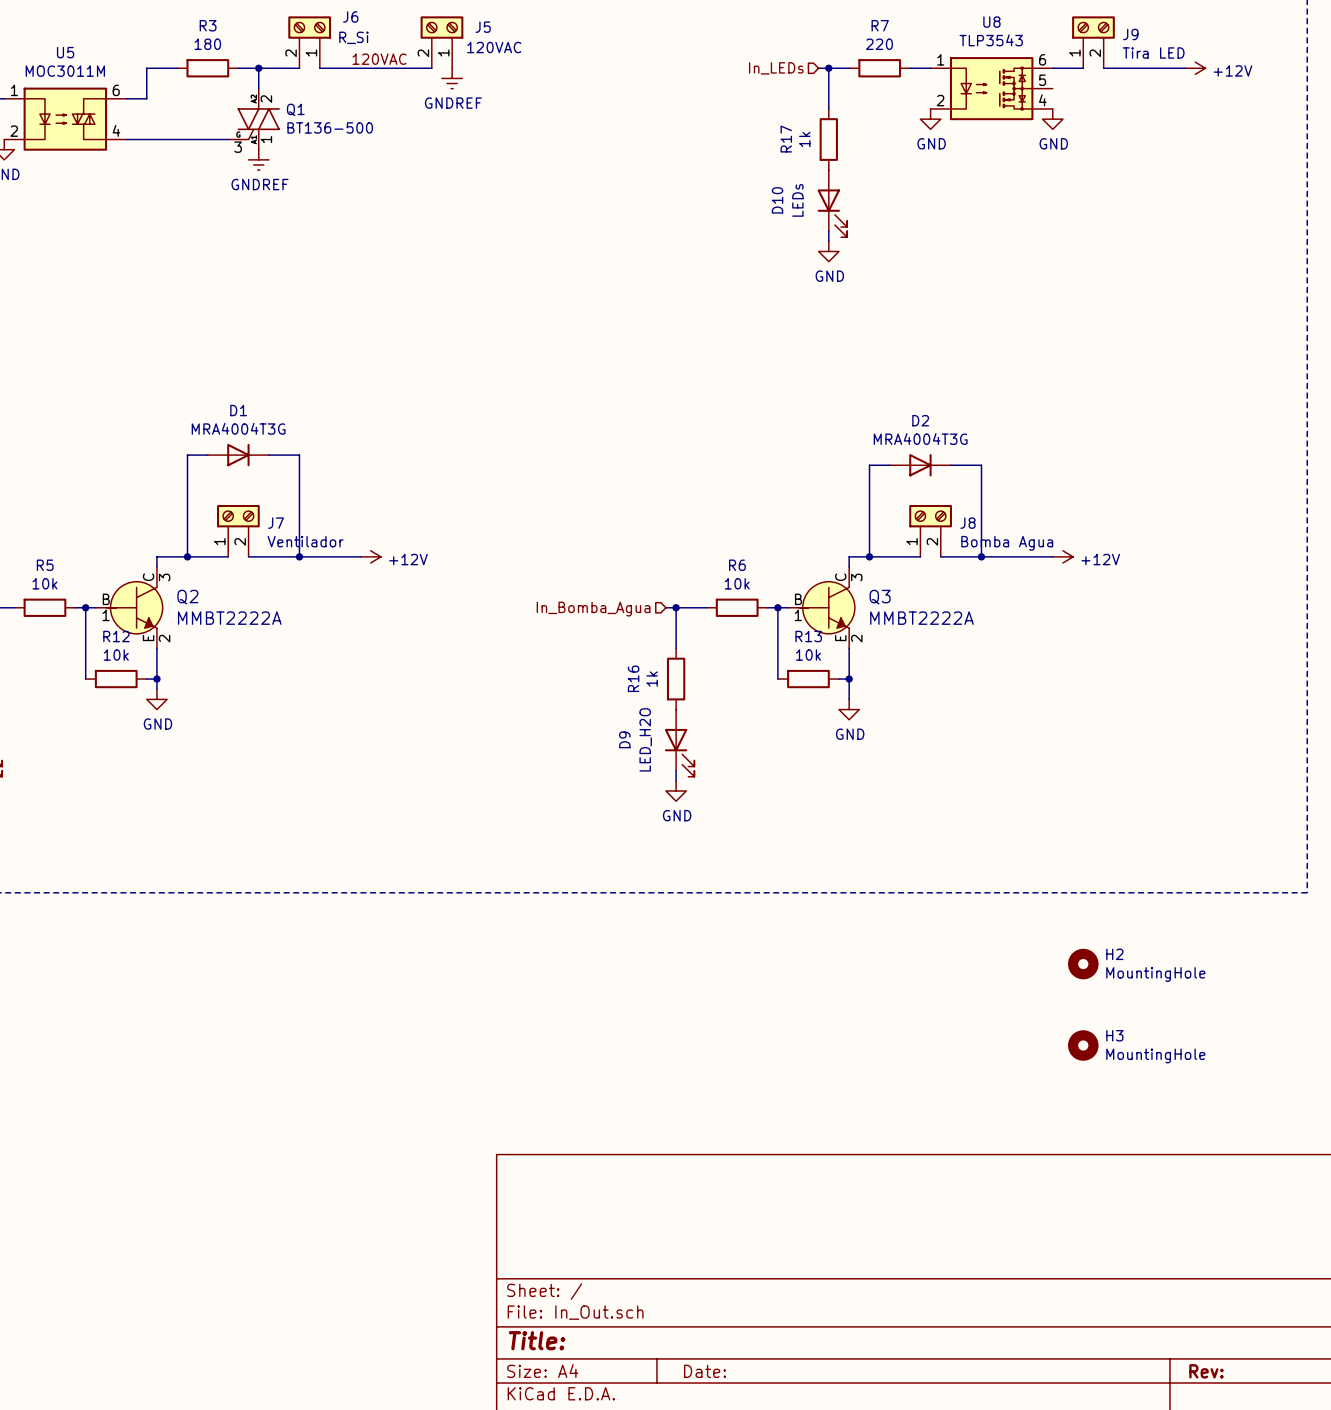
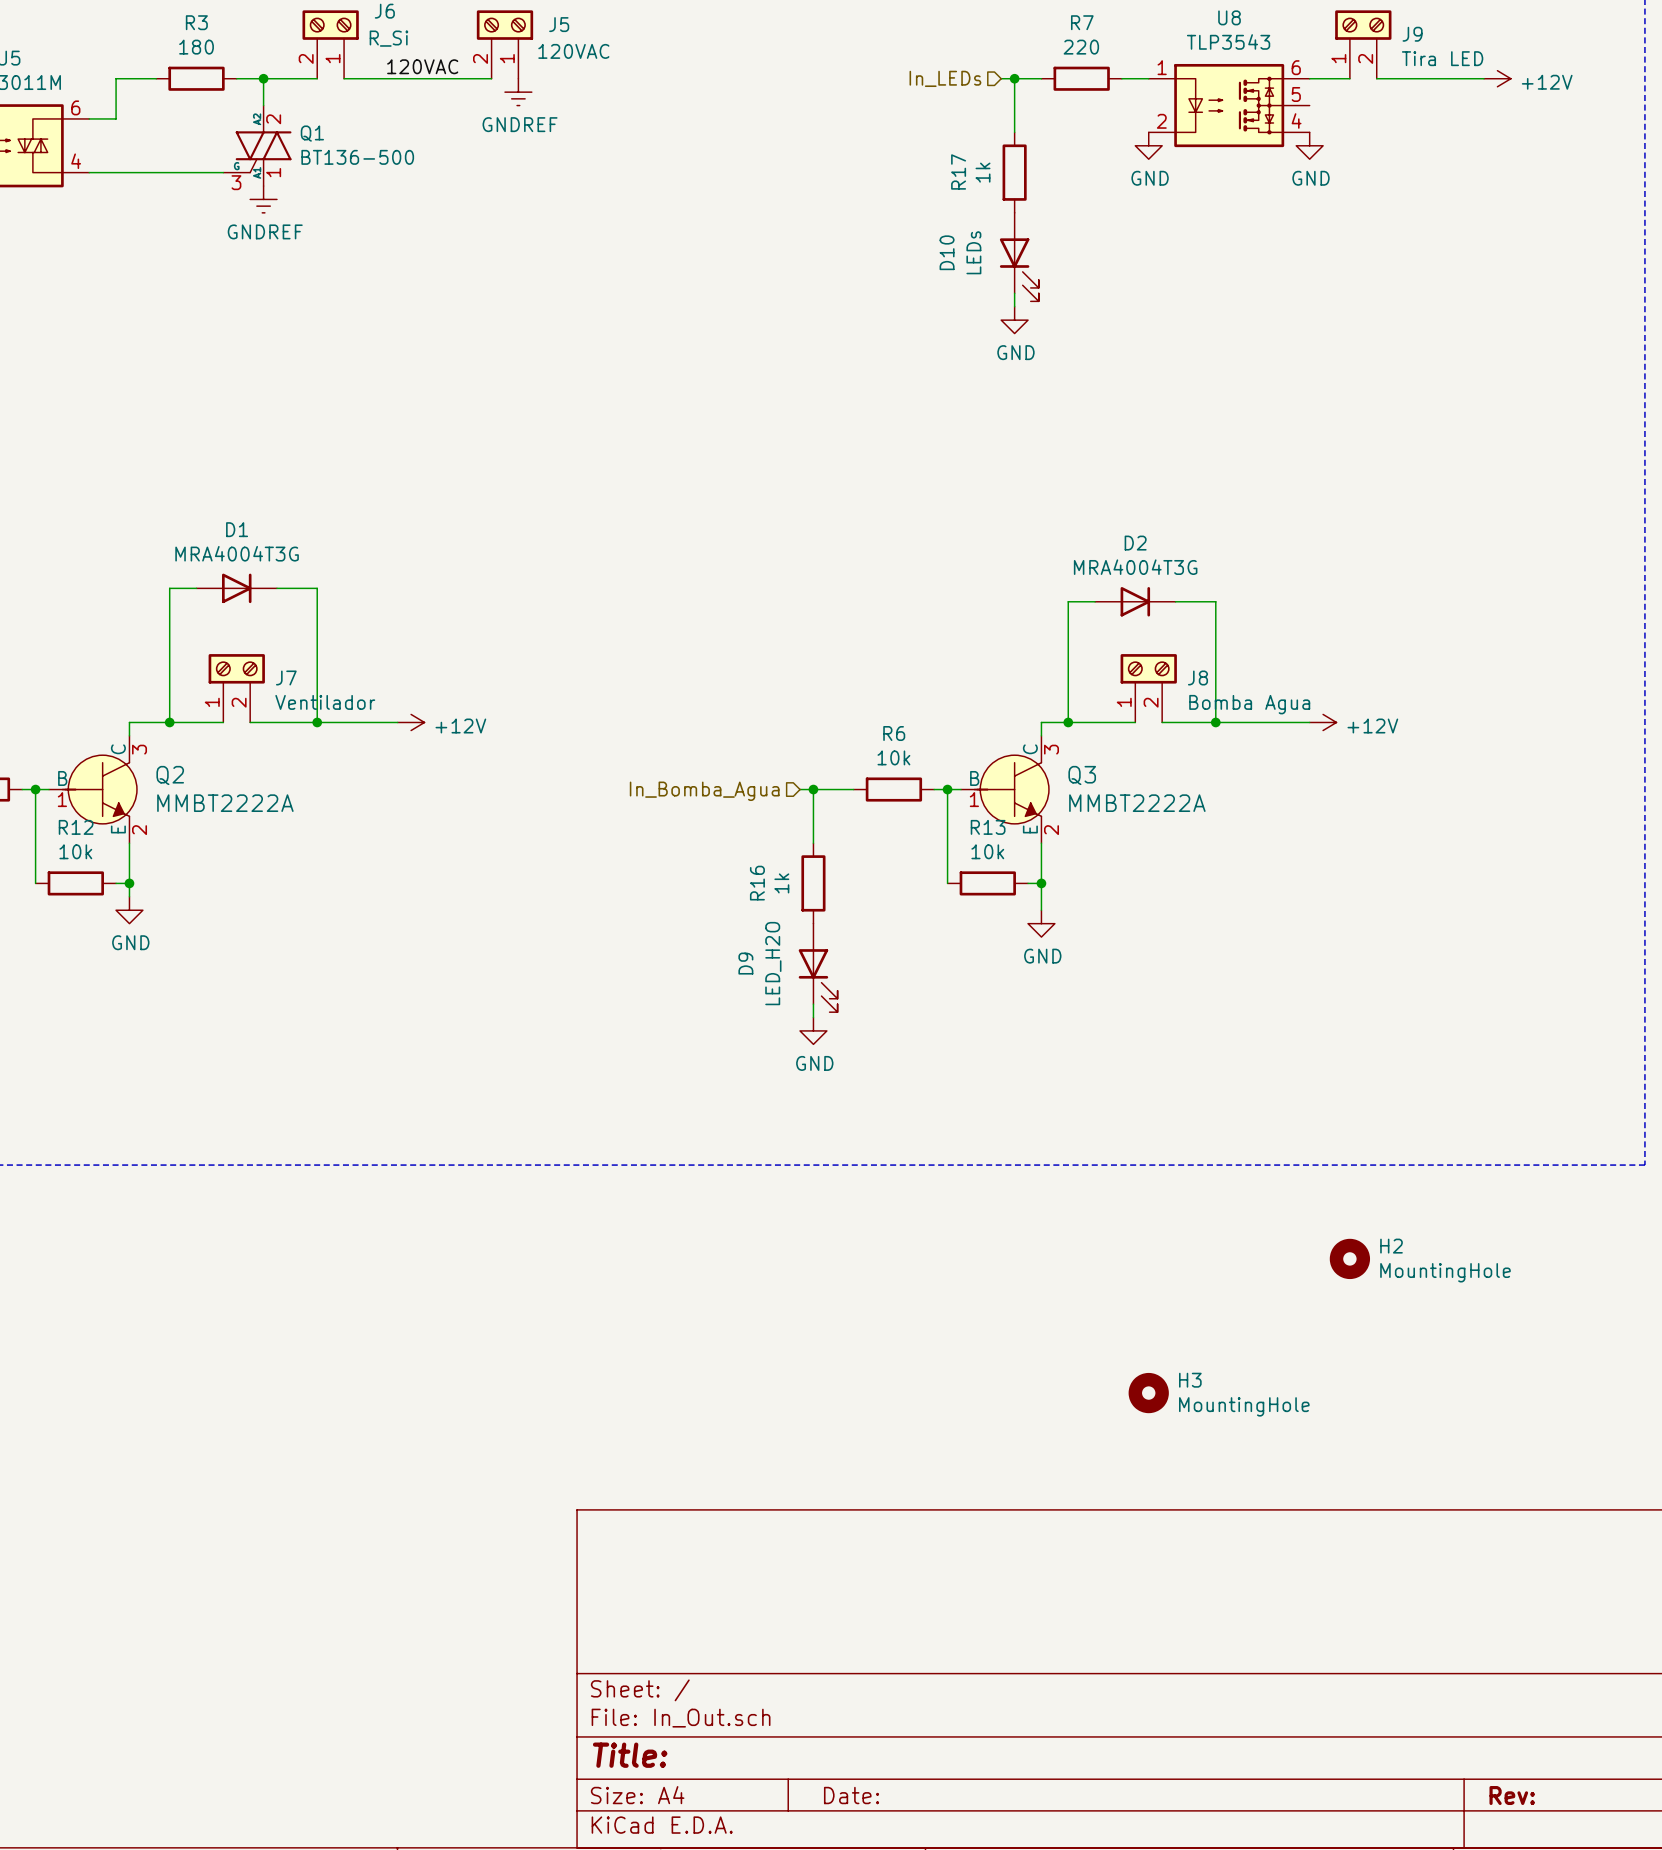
H3 position: (1083, 1045) -> (1148, 1393)

